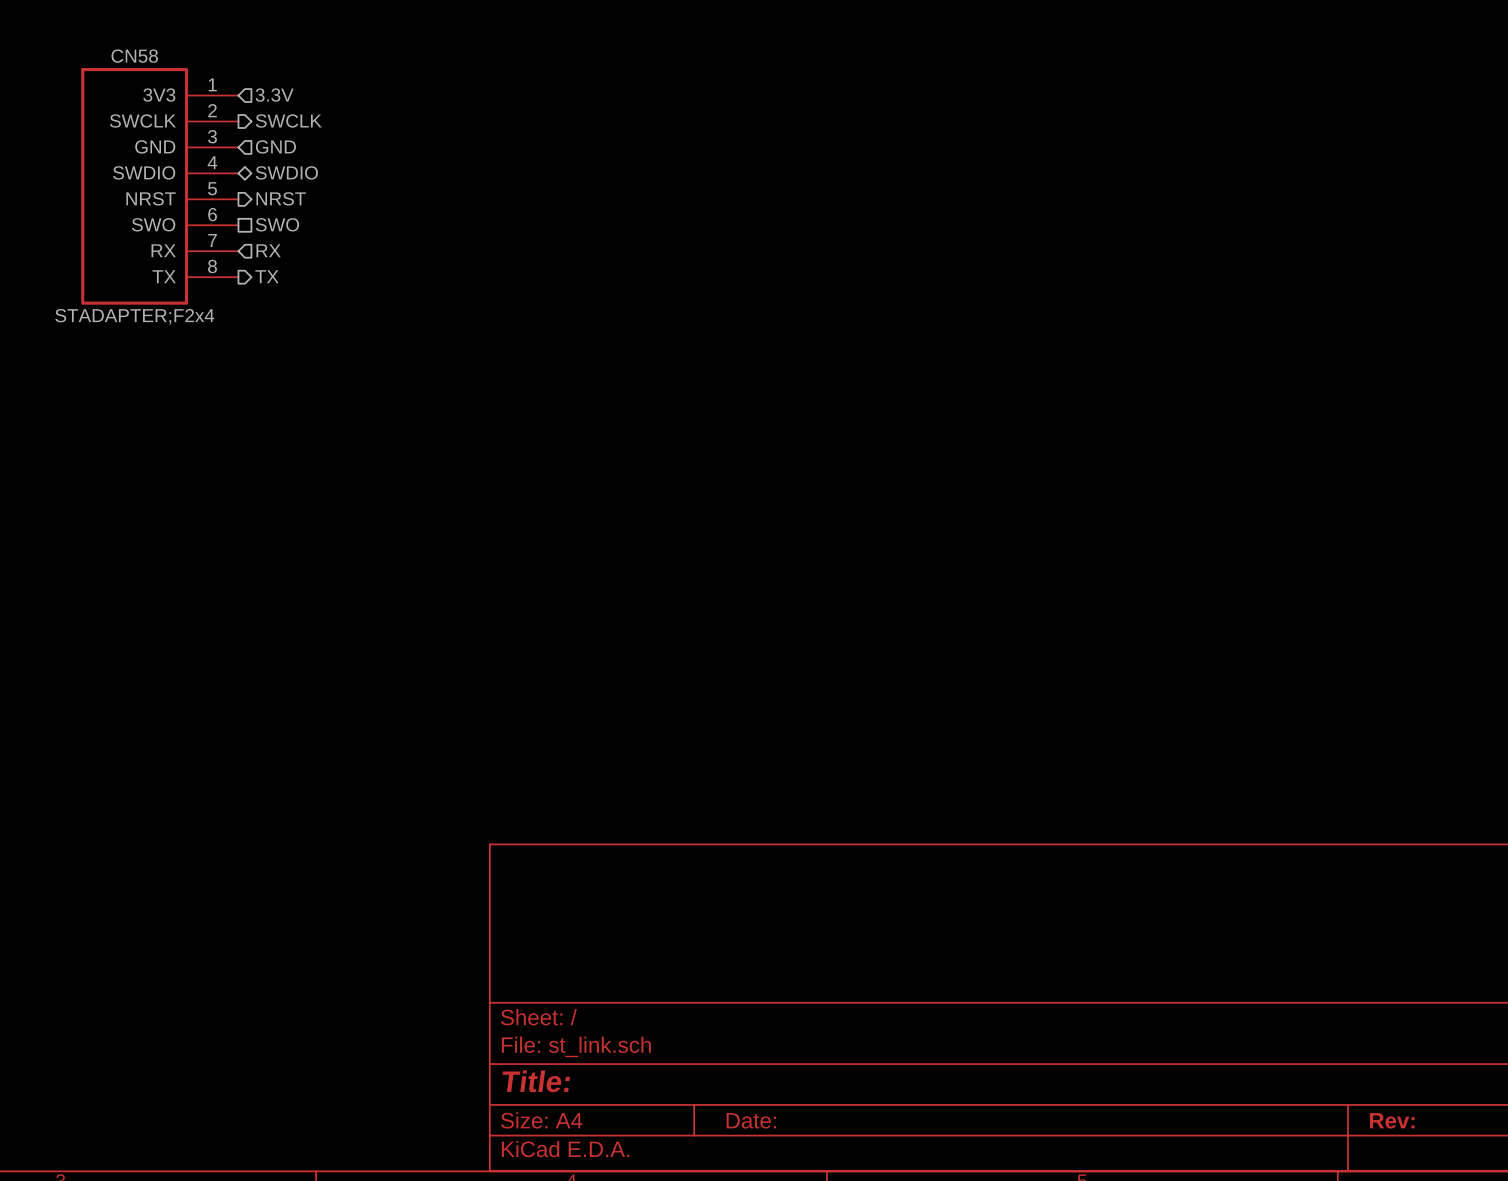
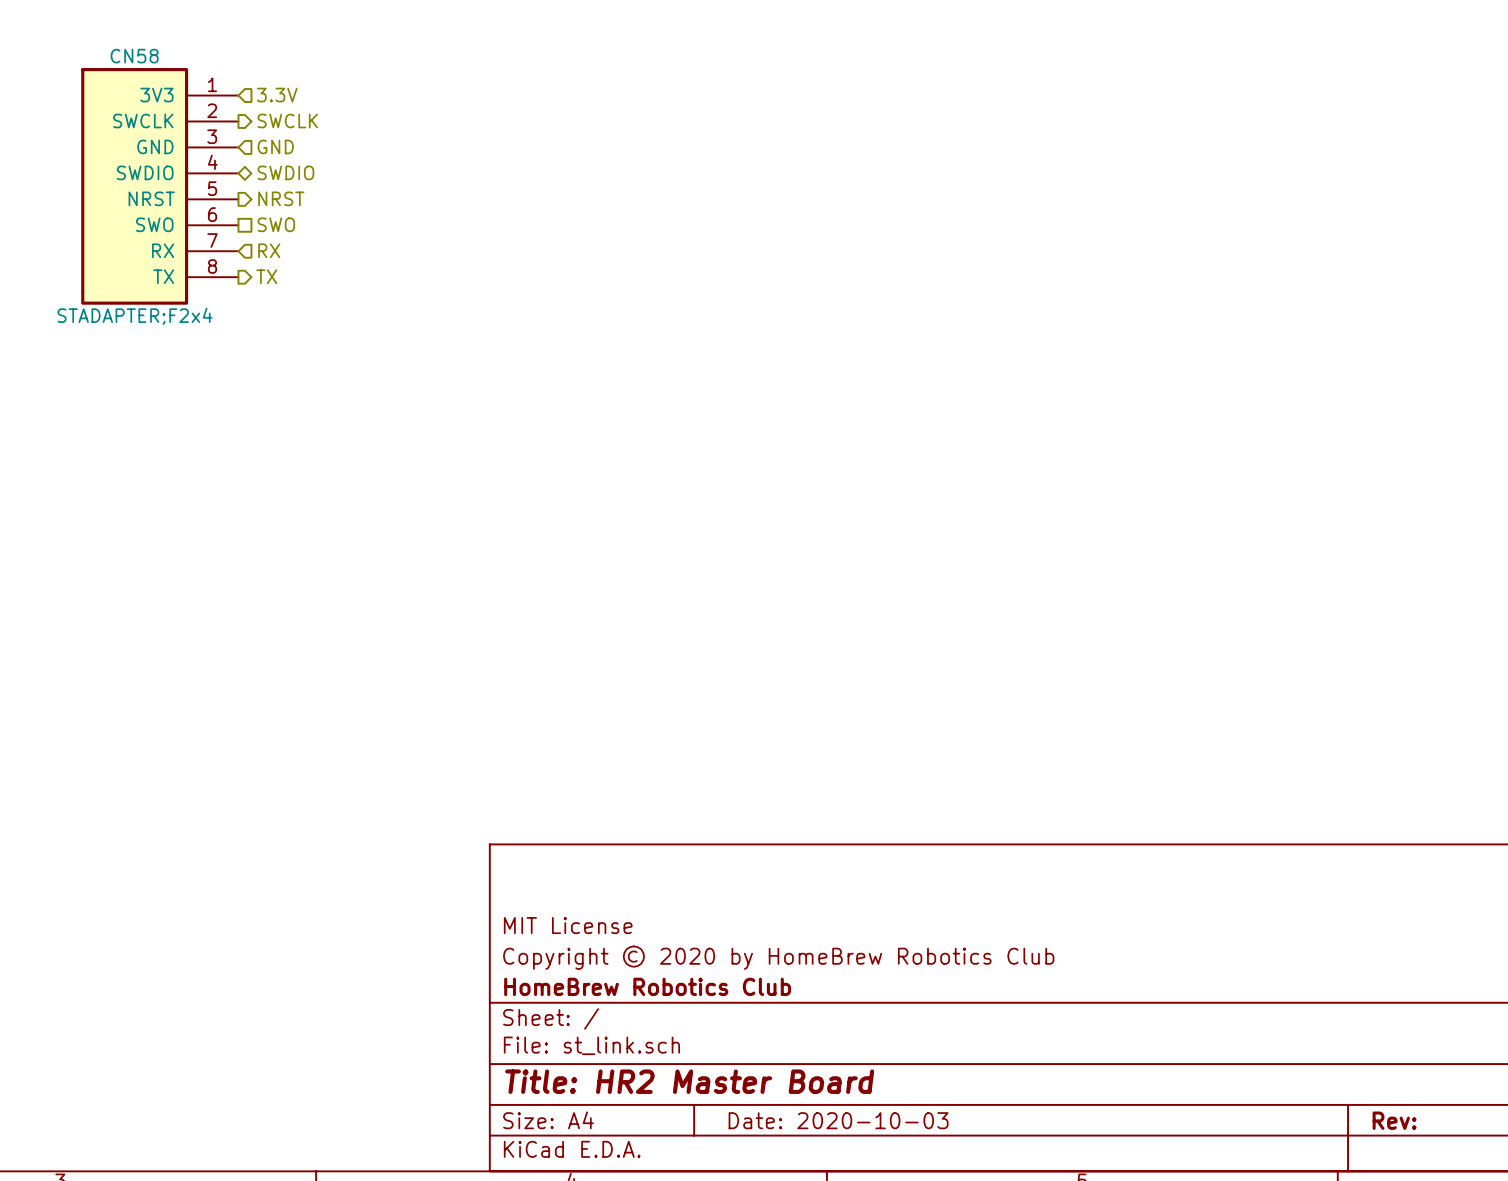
title block: none -> MIT License (568, 925)
title block: none -> Copyright © 2020 by HomeBrew Robotics Club (778, 957)
title block: none -> HomeBrew Robotics Club (647, 986)
title block: Title: (536, 1081) -> Title: HR2 Master Board (689, 1081)
title block: Date: (751, 1120) -> Date: 2020-10-03 (838, 1120)

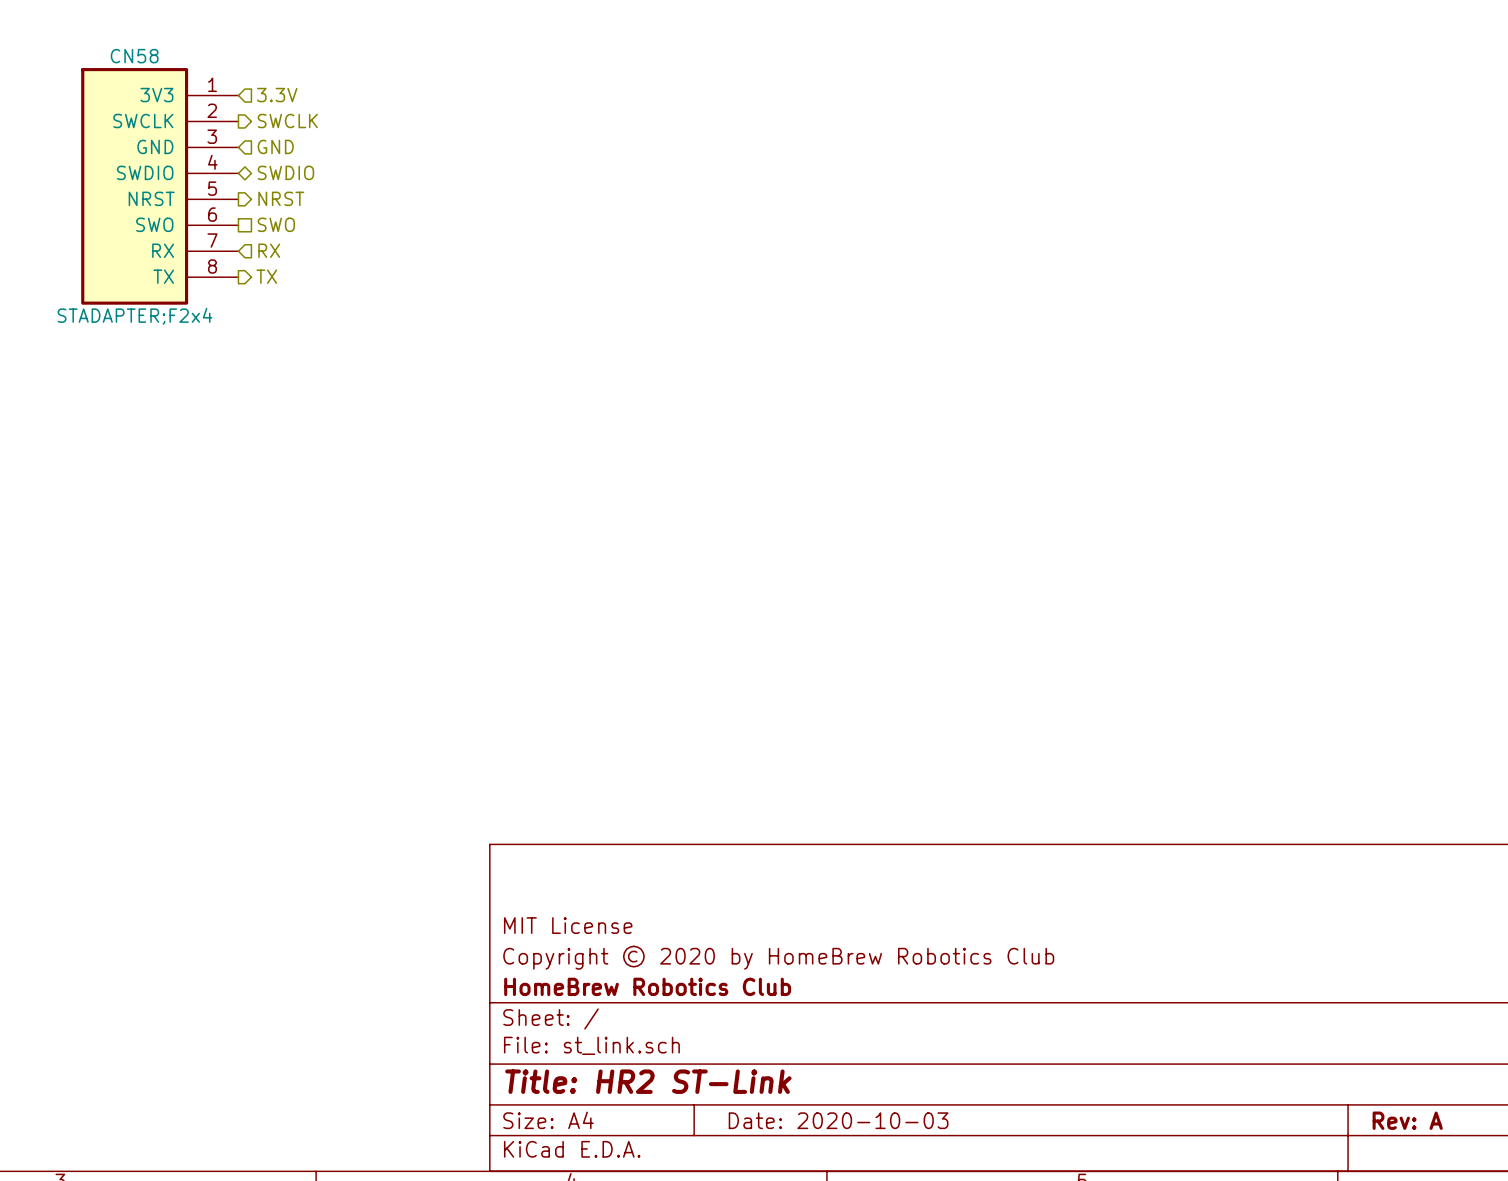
title block: Title: HR2 Master Board (689, 1081) -> Title: HR2 ST-Link (648, 1081)
title block: Rev: (1394, 1120) -> Rev: A (1407, 1120)

